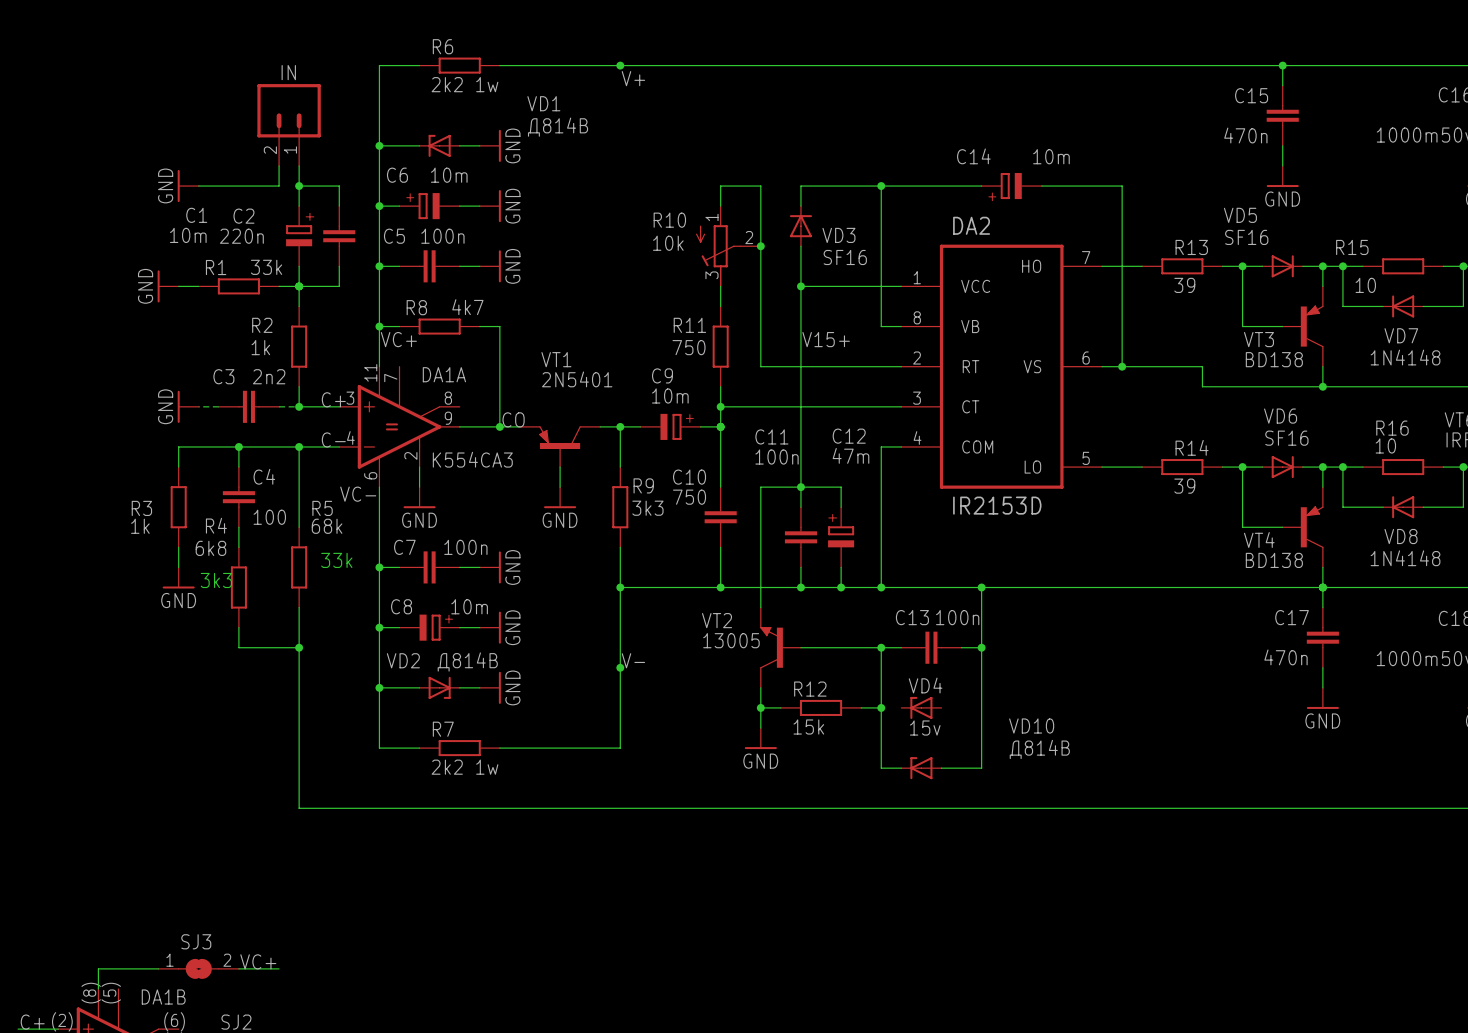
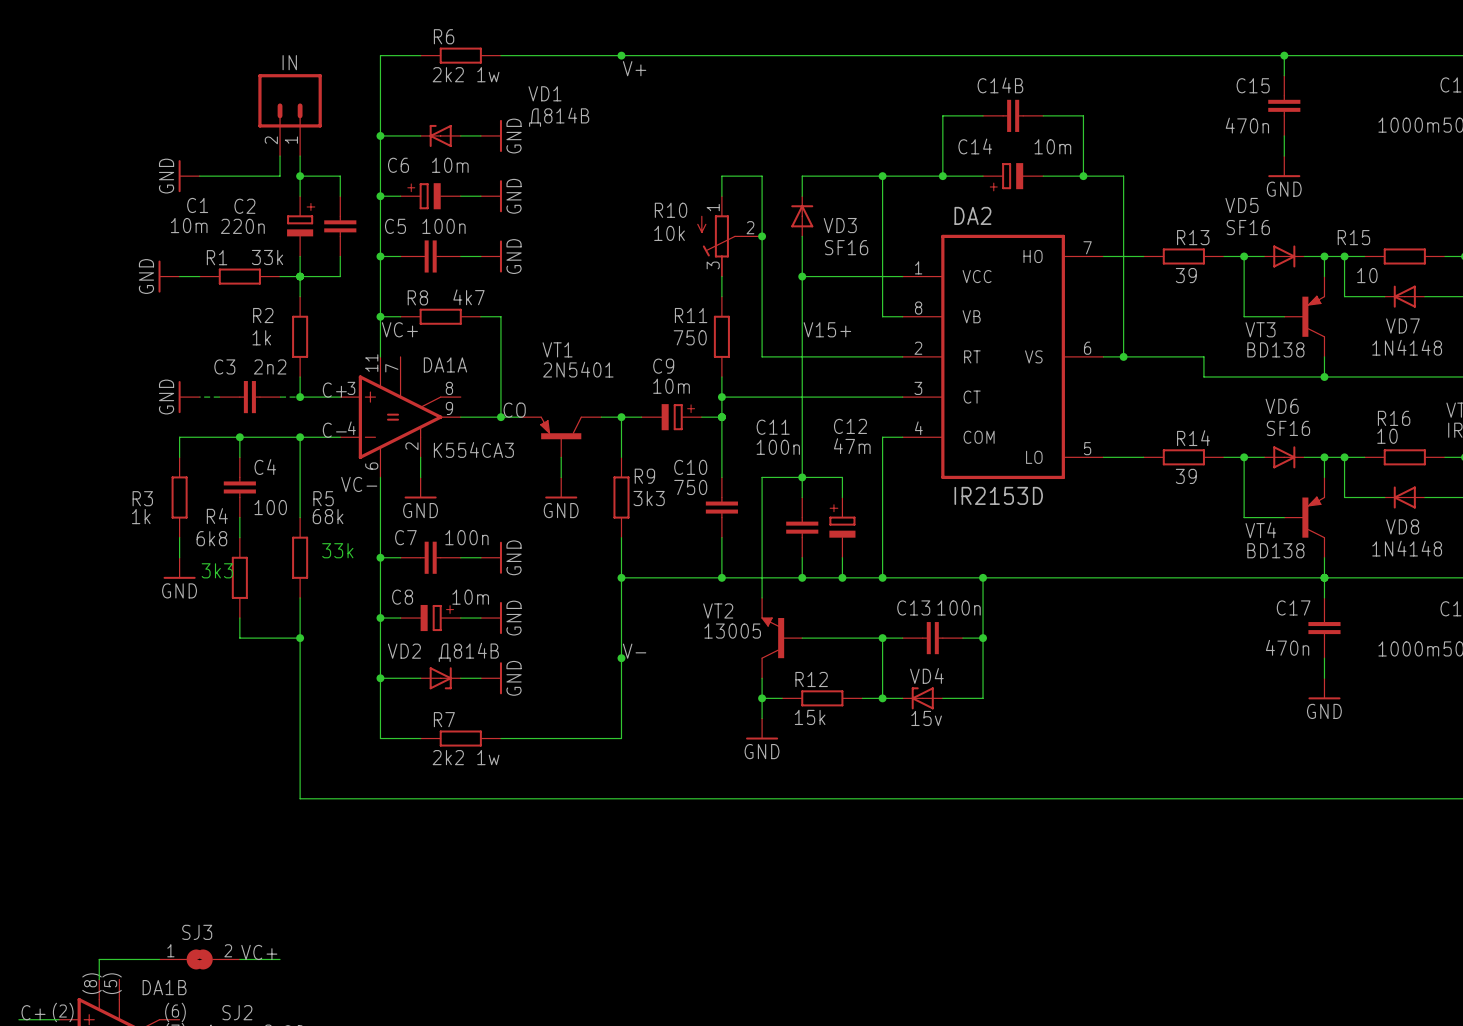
wire: none -> (983, 115) (942, 115) (942, 176)
C14B: none -> (1013, 115)
wire: none -> (1043, 115) (1083, 115) (1083, 176)
junction: none -> (942, 176)
junction: none -> (1083, 176)
wire: (881, 707) (881, 768) (901, 768) -> (882, 698) (902, 698)
wire: (981, 707) (981, 768) (941, 768) -> (983, 698) (942, 698)
VD10: Д814В (921, 768) -> none

